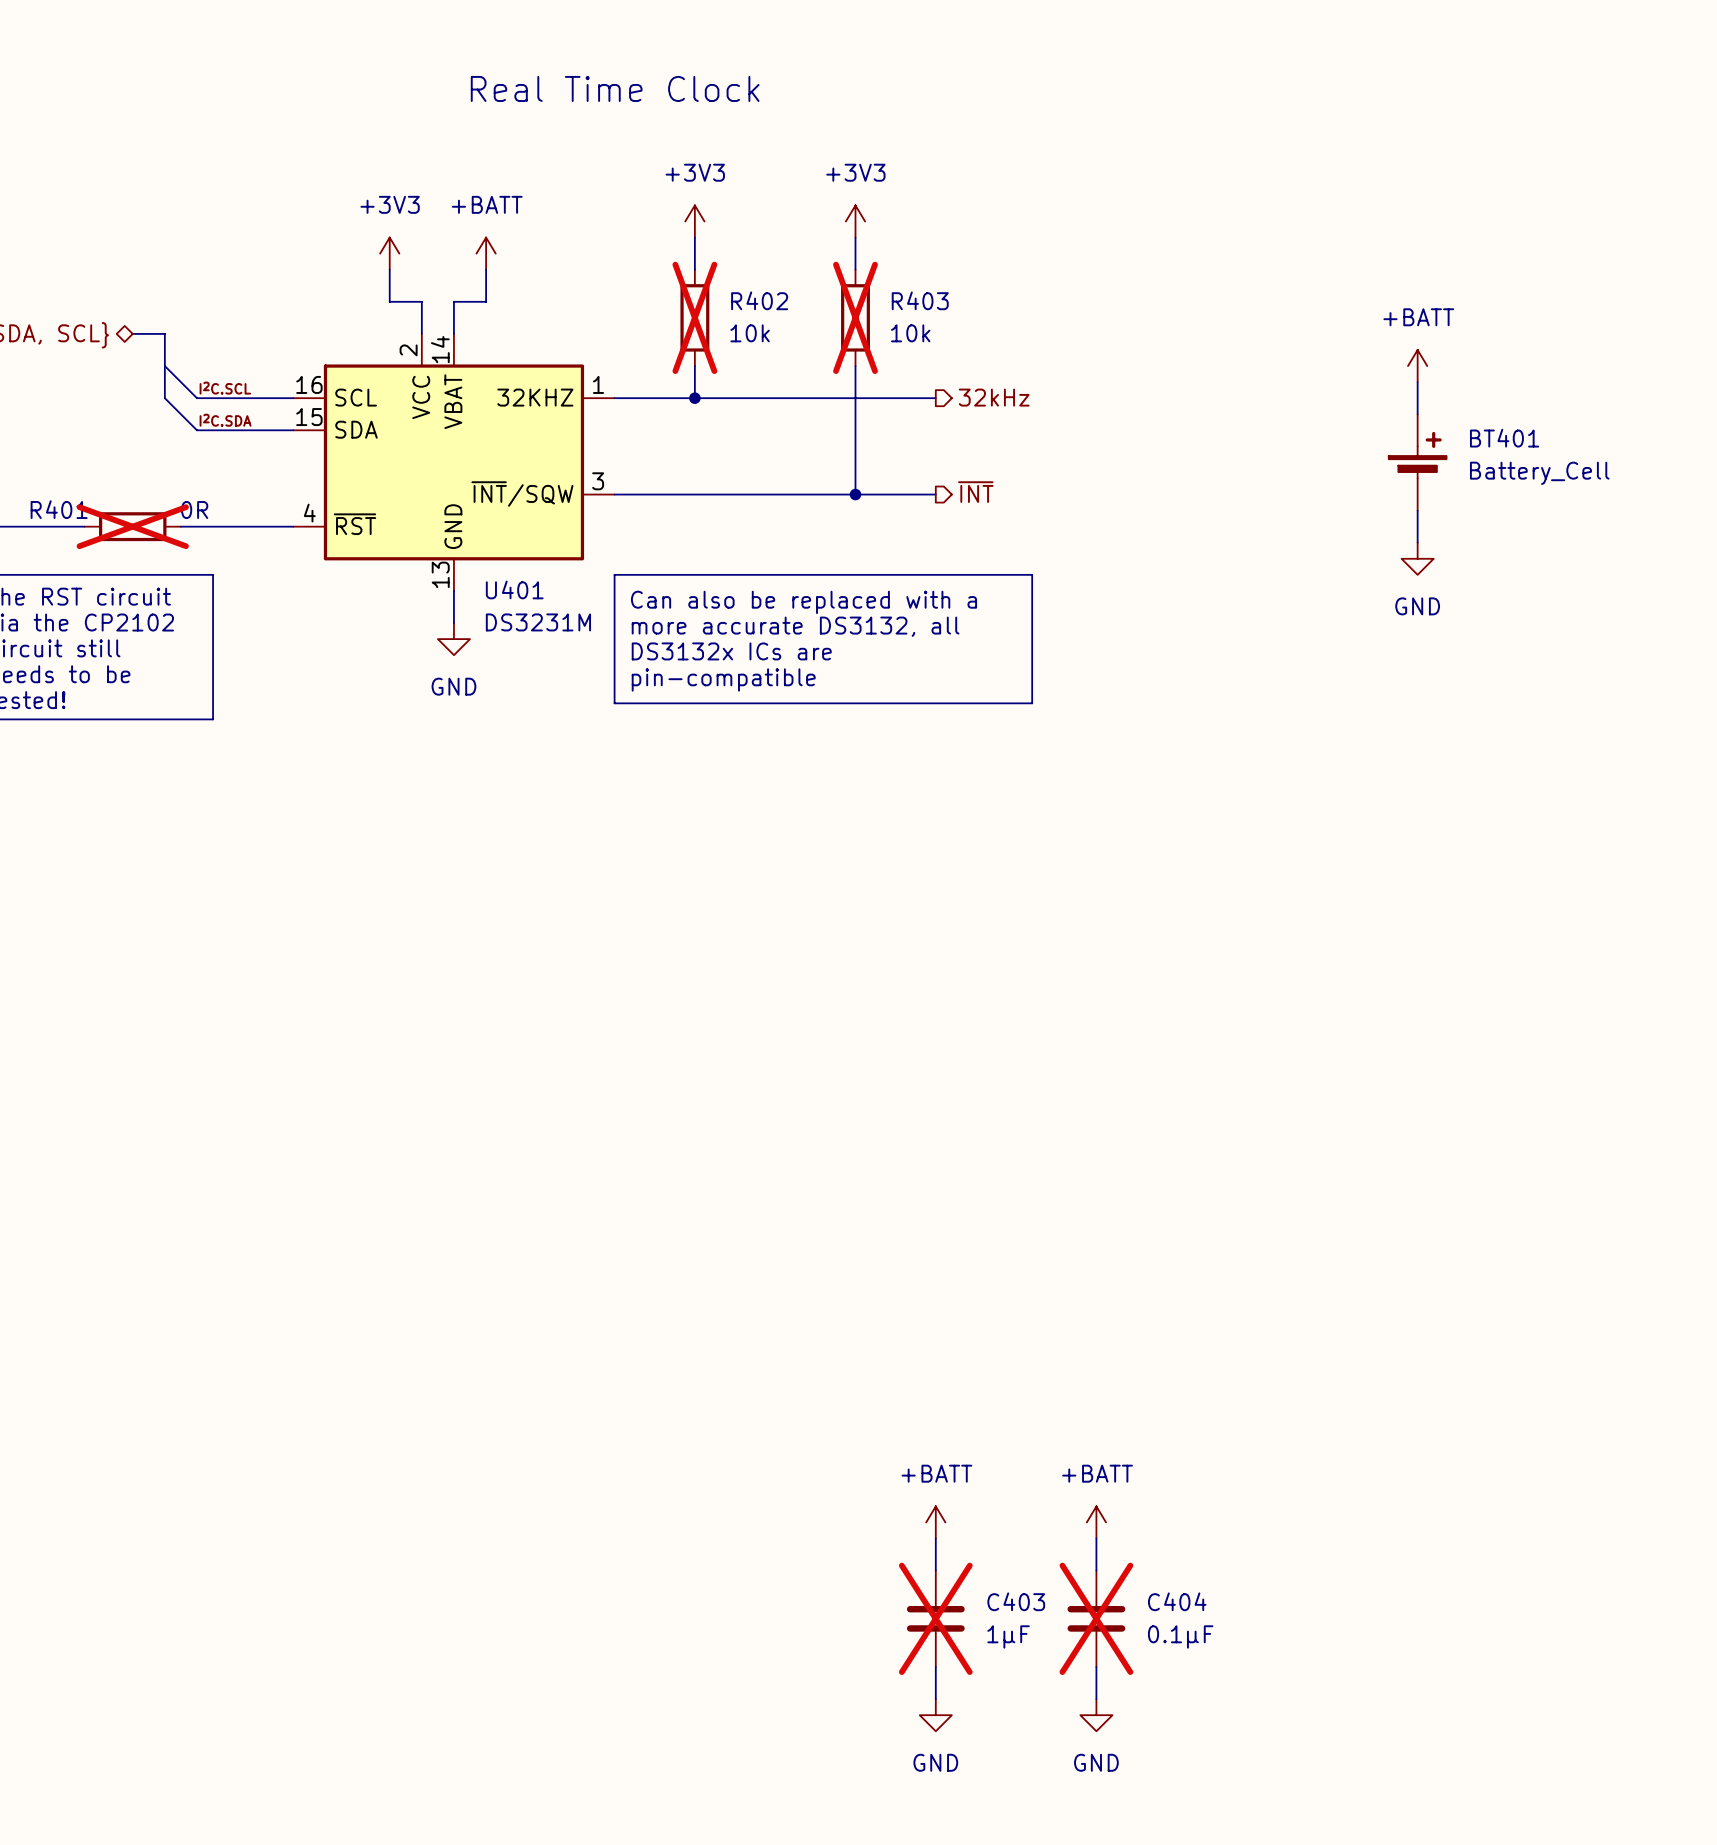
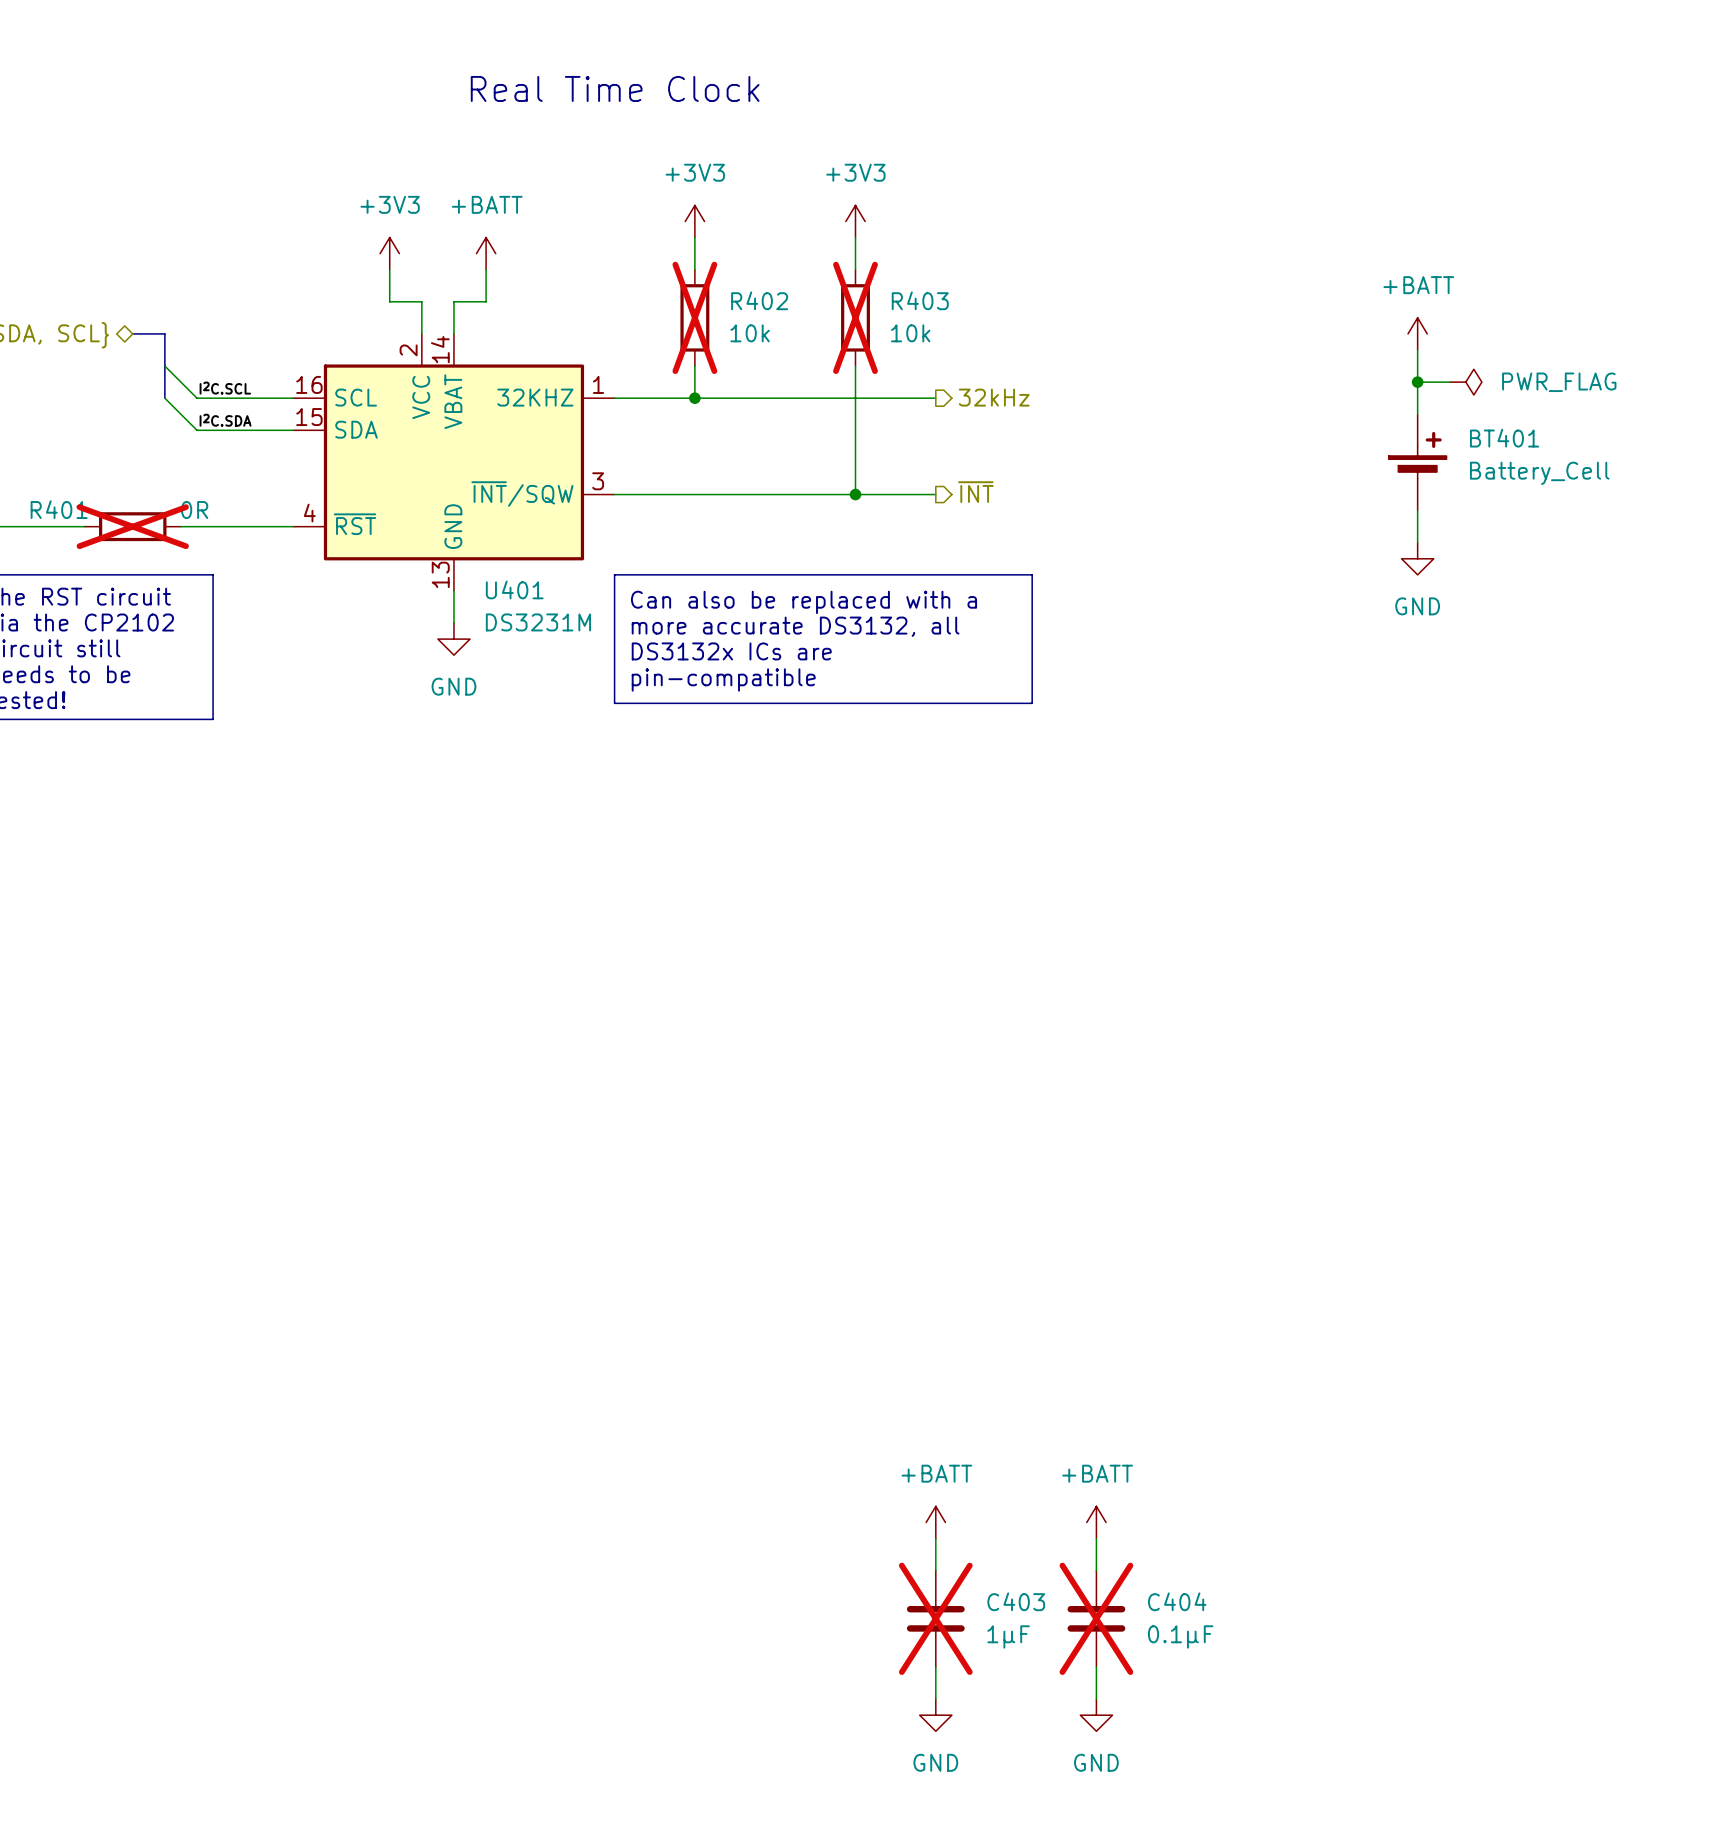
wire: none -> (1417, 350) (1417, 382) (1449, 382)
power symbol position: +BATT (1417, 366) -> +BATT (1417, 333)
junction: none -> (1417, 382)
power symbol: none -> PWR_FLAG (1465, 382)

